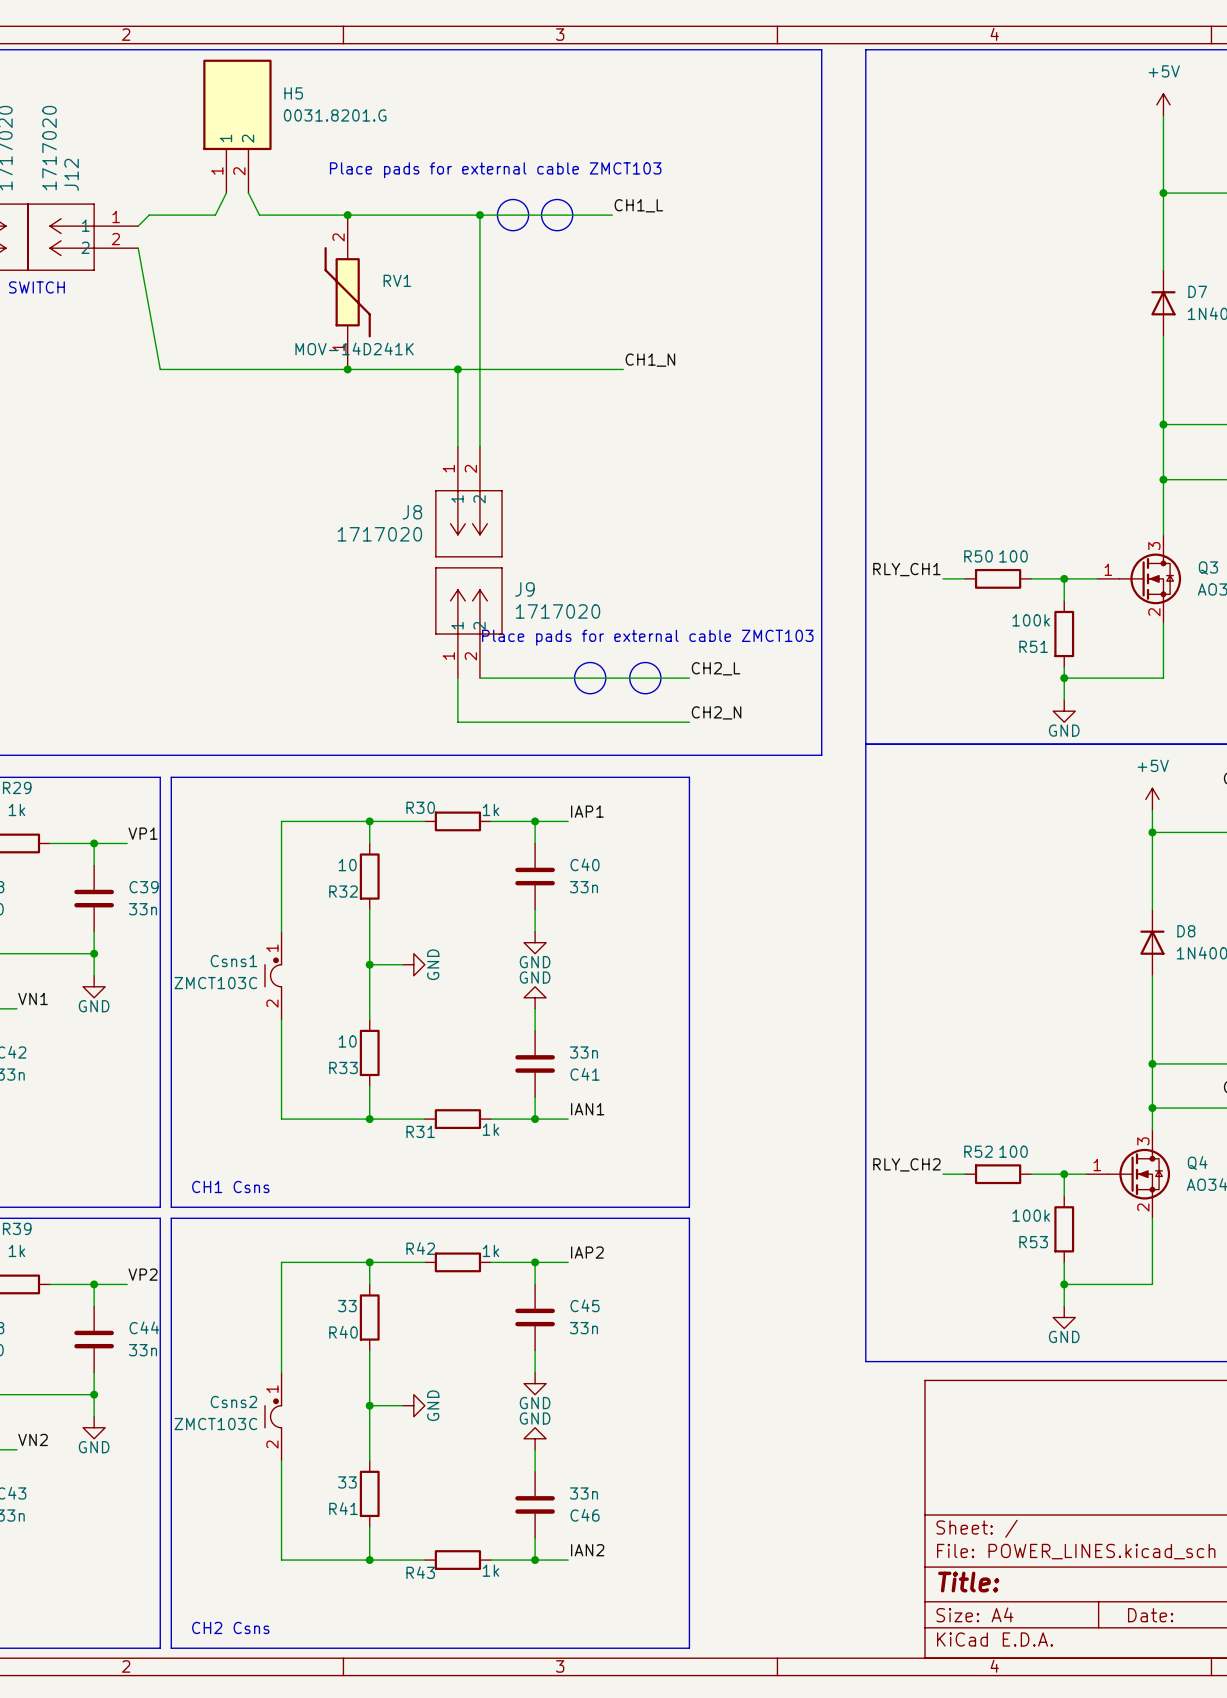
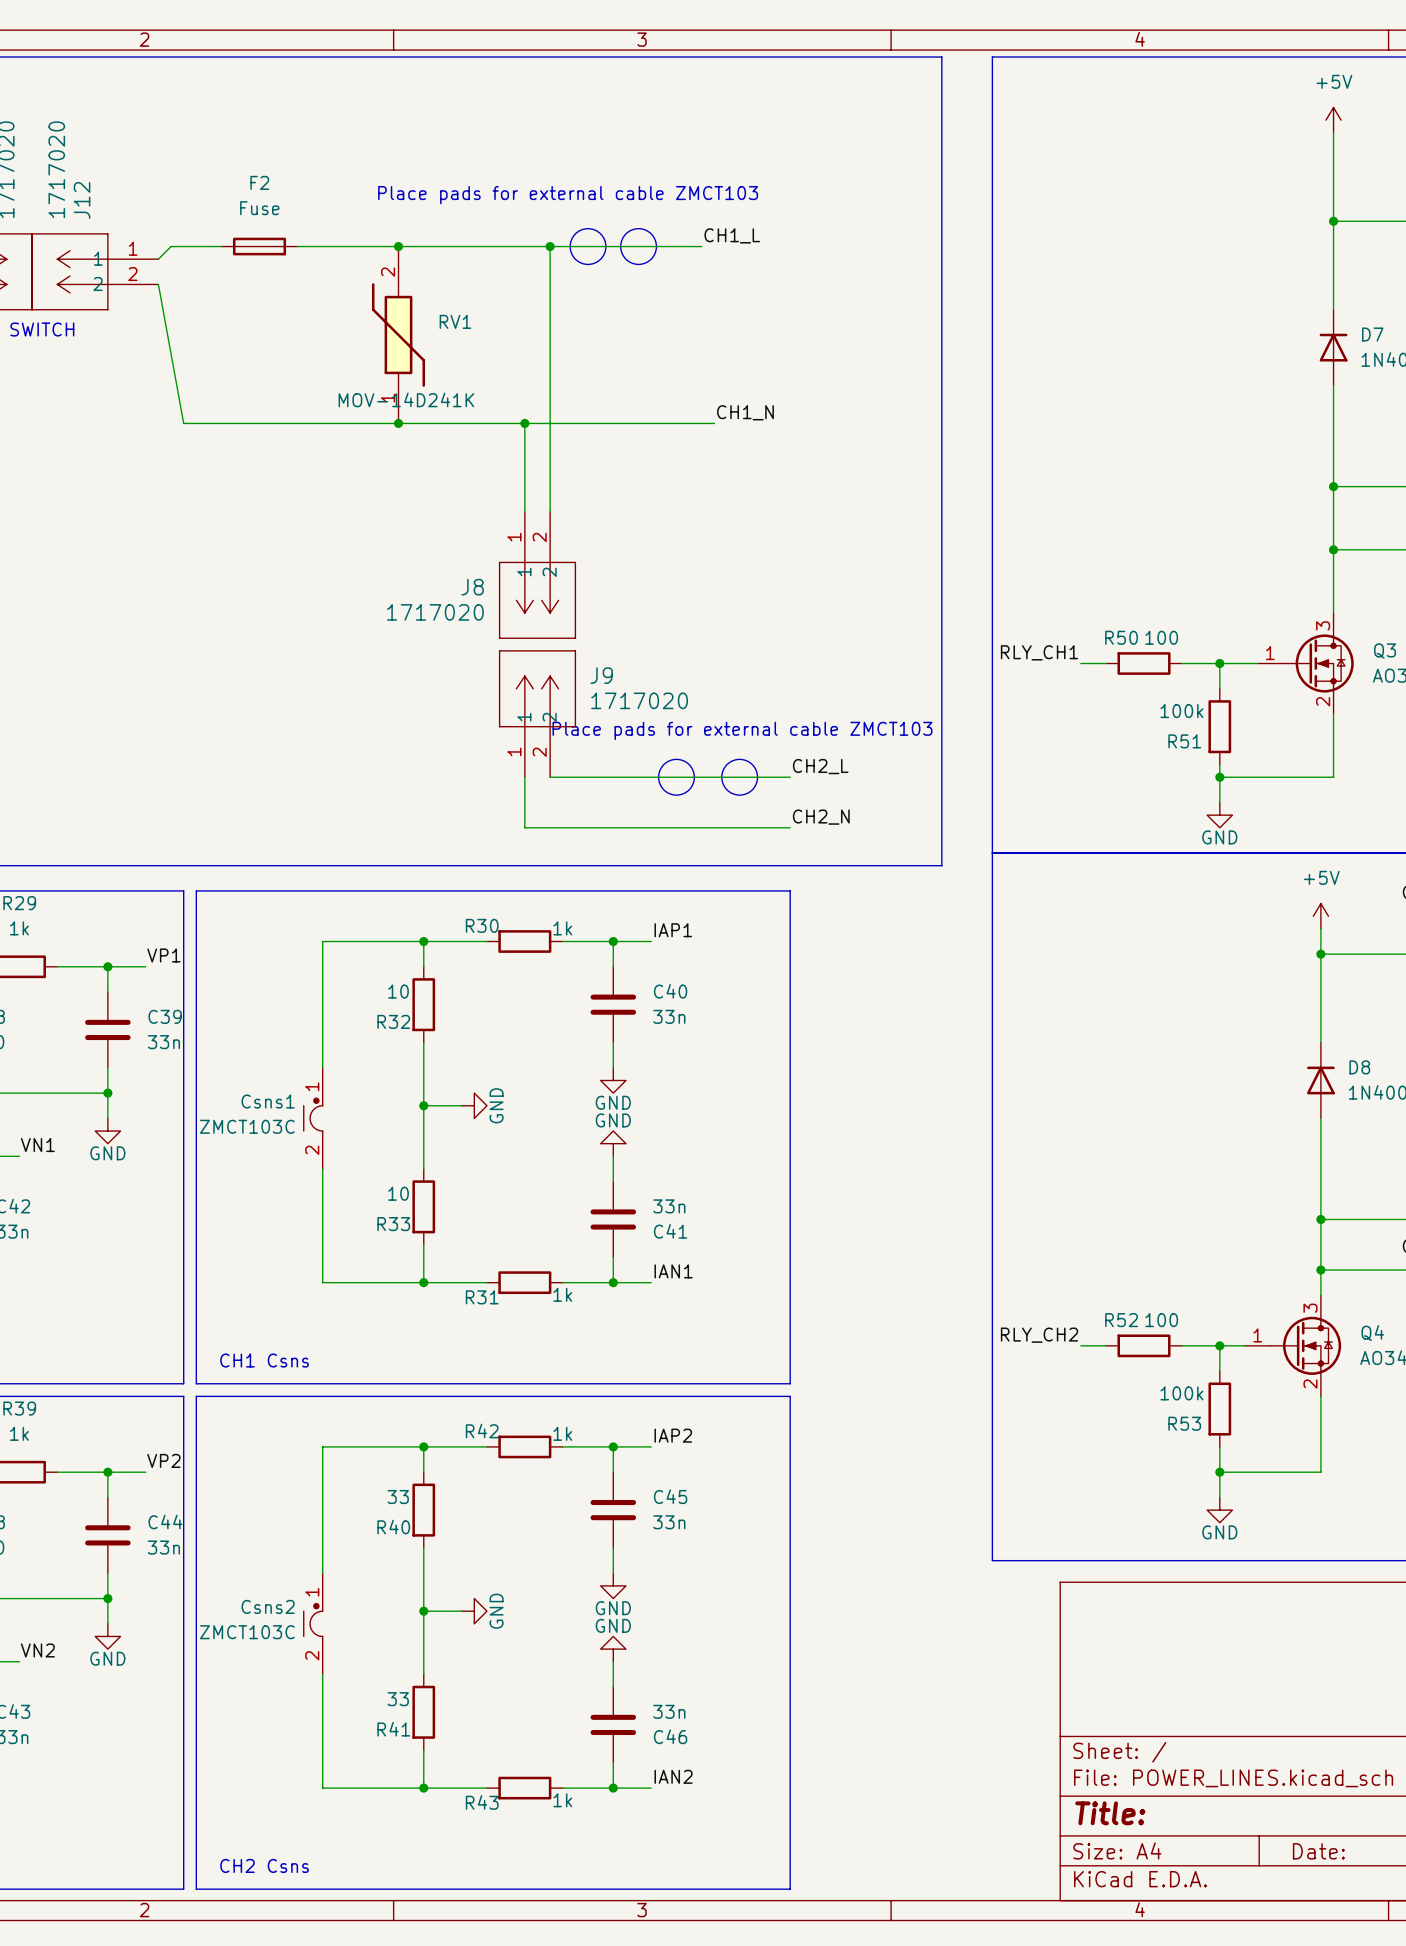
H5: 0031.8201.G (237, 126) -> none
wire: (226, 193) (215, 215) (193, 215) -> none
wire: (248, 193) (259, 215) -> none
F2: none -> Fuse (259, 246)

